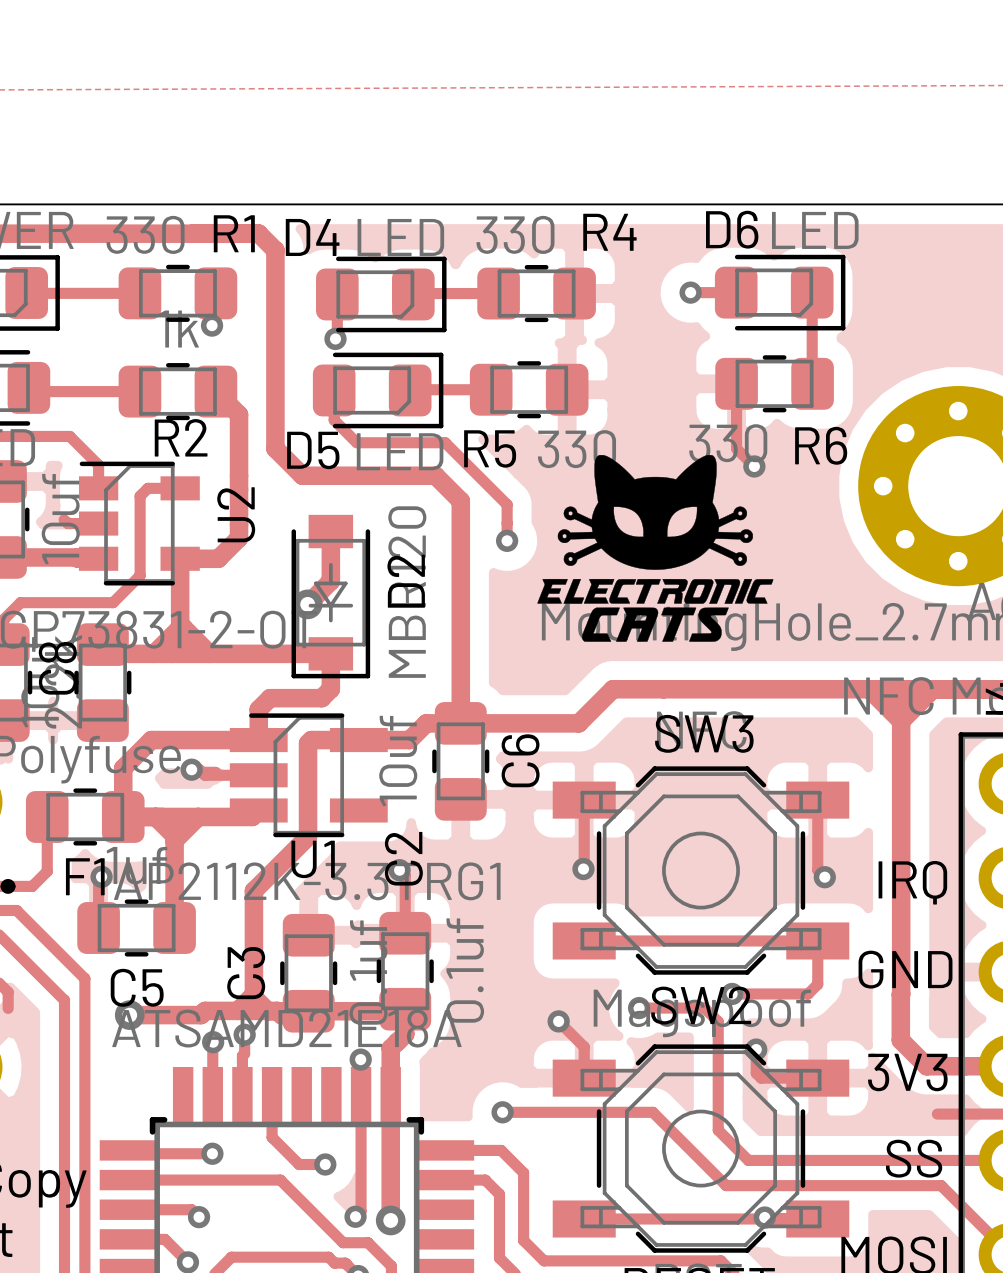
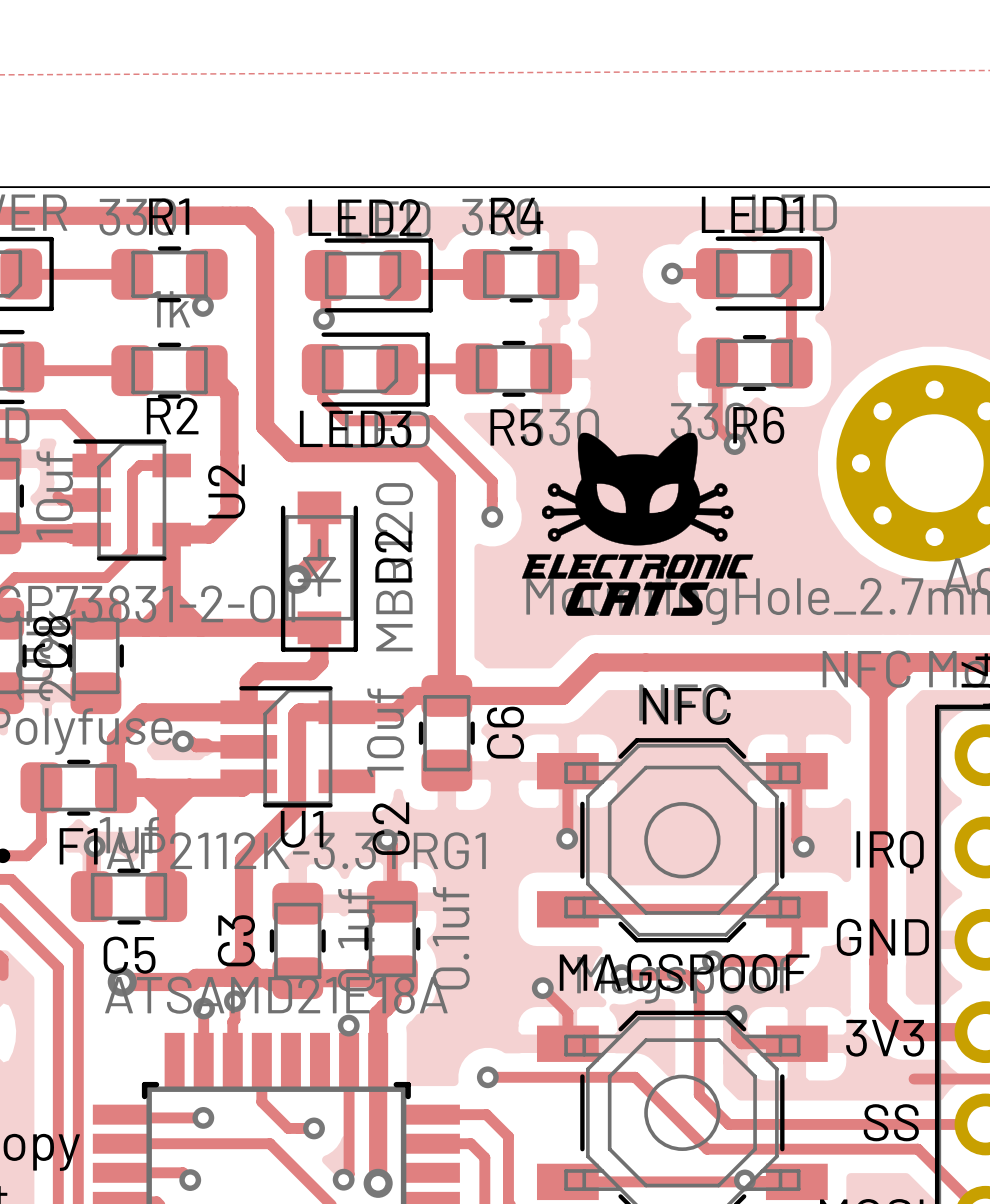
D6 name: D6 (732, 229) -> LED1 (752, 214)
R4 name position: R4 (609, 232) -> R4 (517, 215)
R1 name position: R1 (234, 233) -> R1 (169, 216)
D4 name: D4 (312, 237) -> LED2 (364, 217)
R6 name position: R6 (821, 445) -> R6 (758, 425)
R5 name position: R5 (490, 448) -> R5 (515, 427)
D5 name: D5 (313, 450) -> LED3 (355, 429)
SW3 name: SW3 (704, 733) -> NFC (686, 706)
SW2 name: SW2 (701, 1005) -> MAGSPOOF (684, 972)

